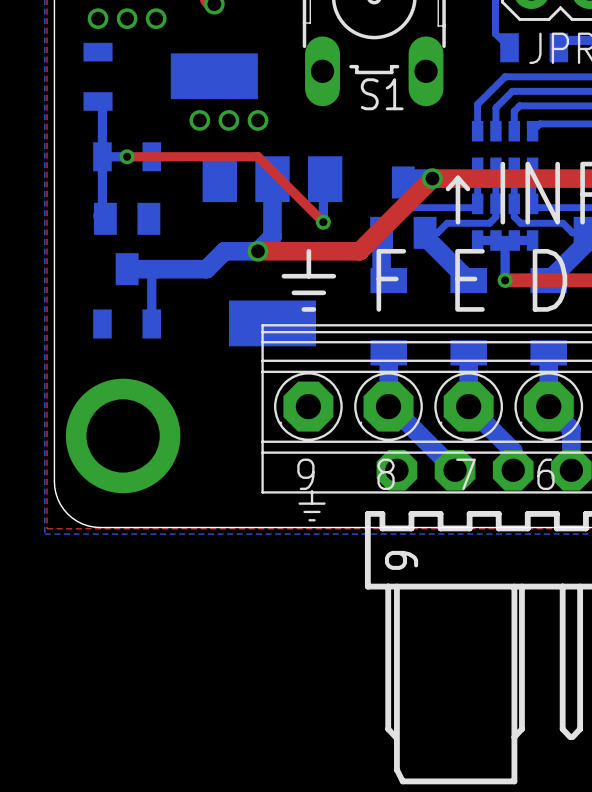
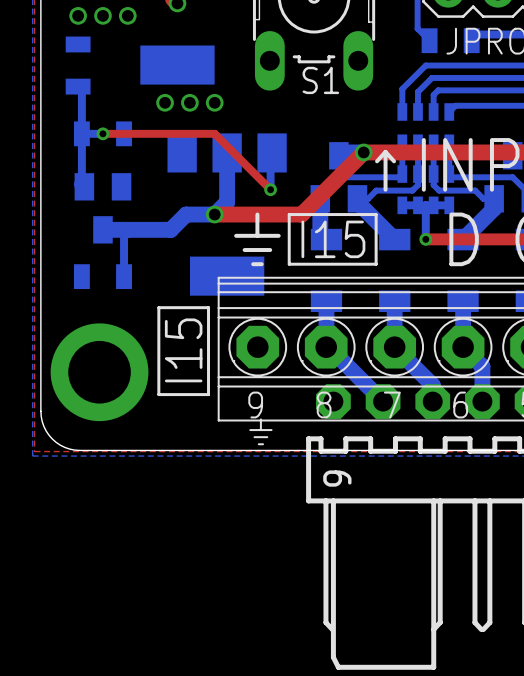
line: none -> (289, 214) (376, 214) (376, 264) (289, 264) (289, 214)
text position: ⏚ (308, 280) -> ⏚ (257, 239)
text: F (391, 280) -> I15 (333, 239)
text: E (470, 280) -> none
line: none -> (158, 307) (208, 307) (208, 394) (158, 394) (158, 307)
text: none -> I15 (183, 350)

